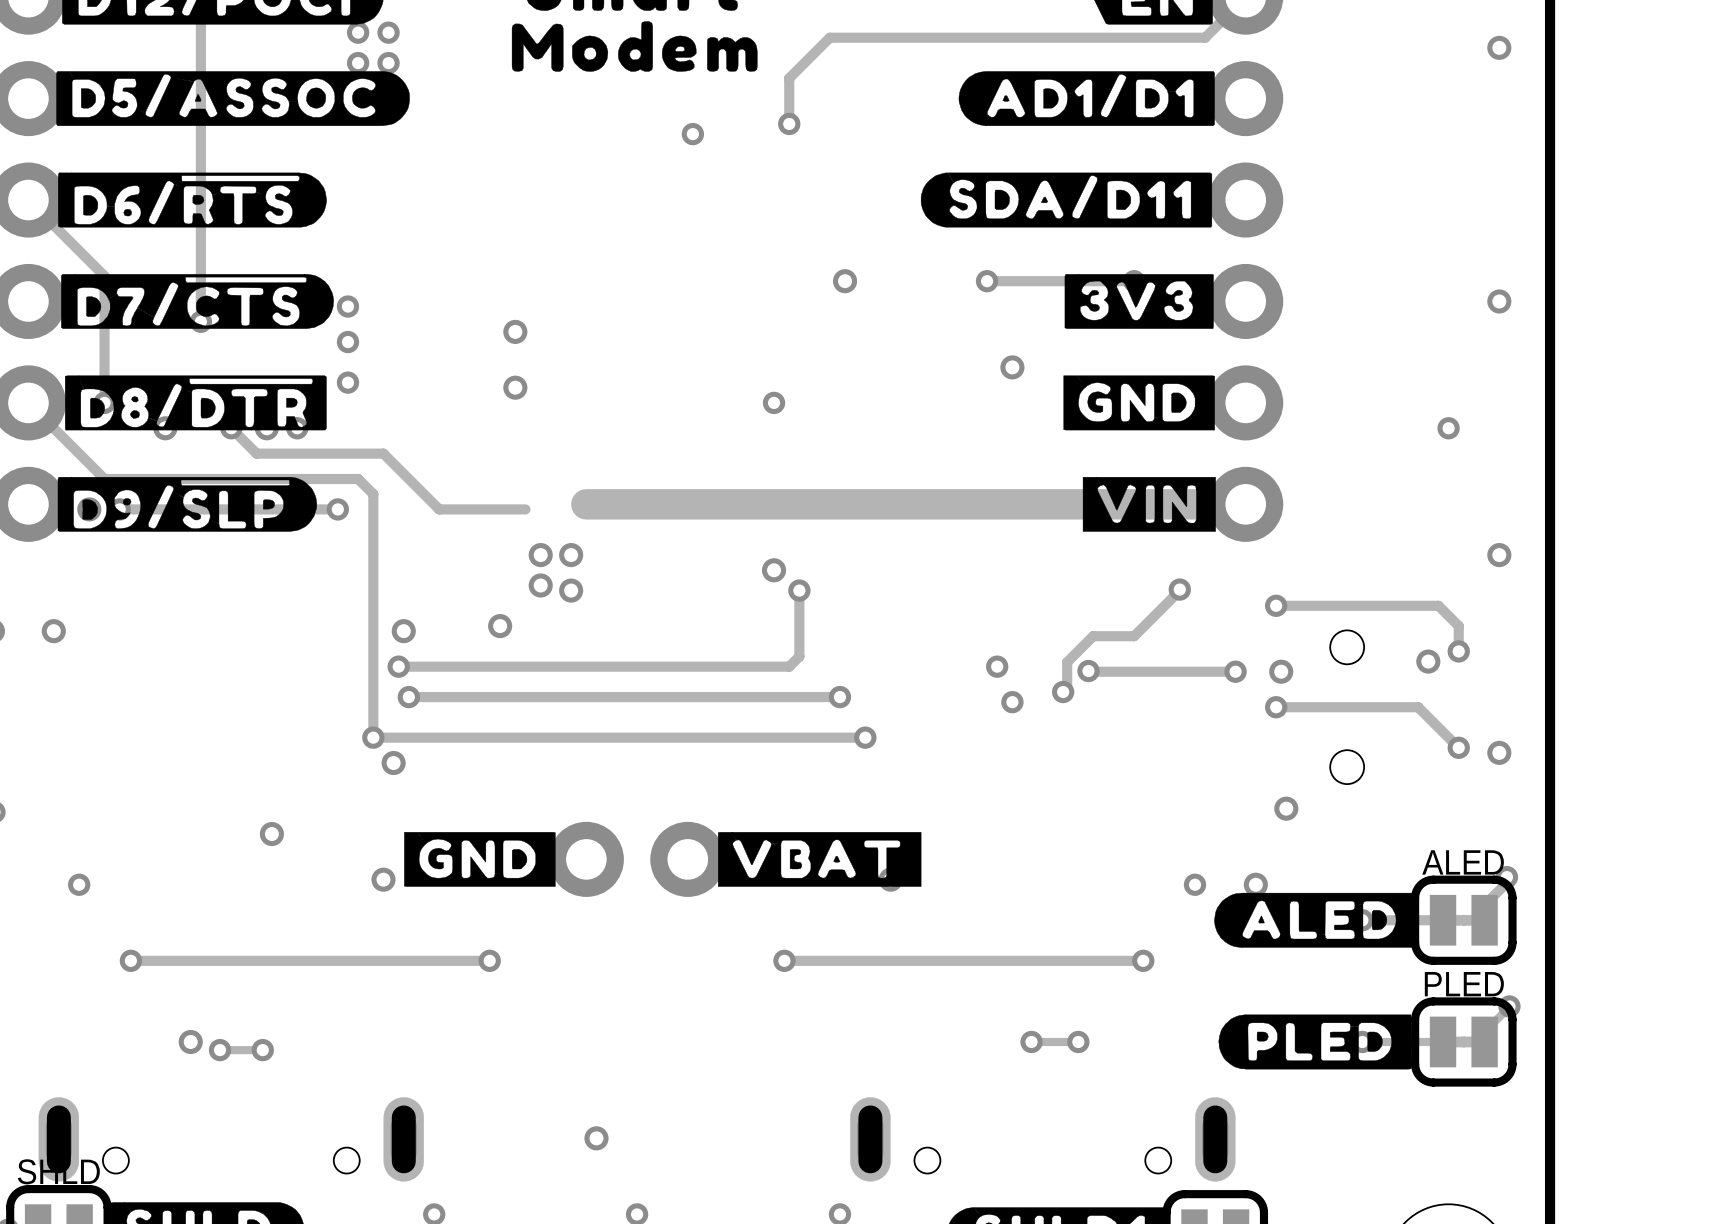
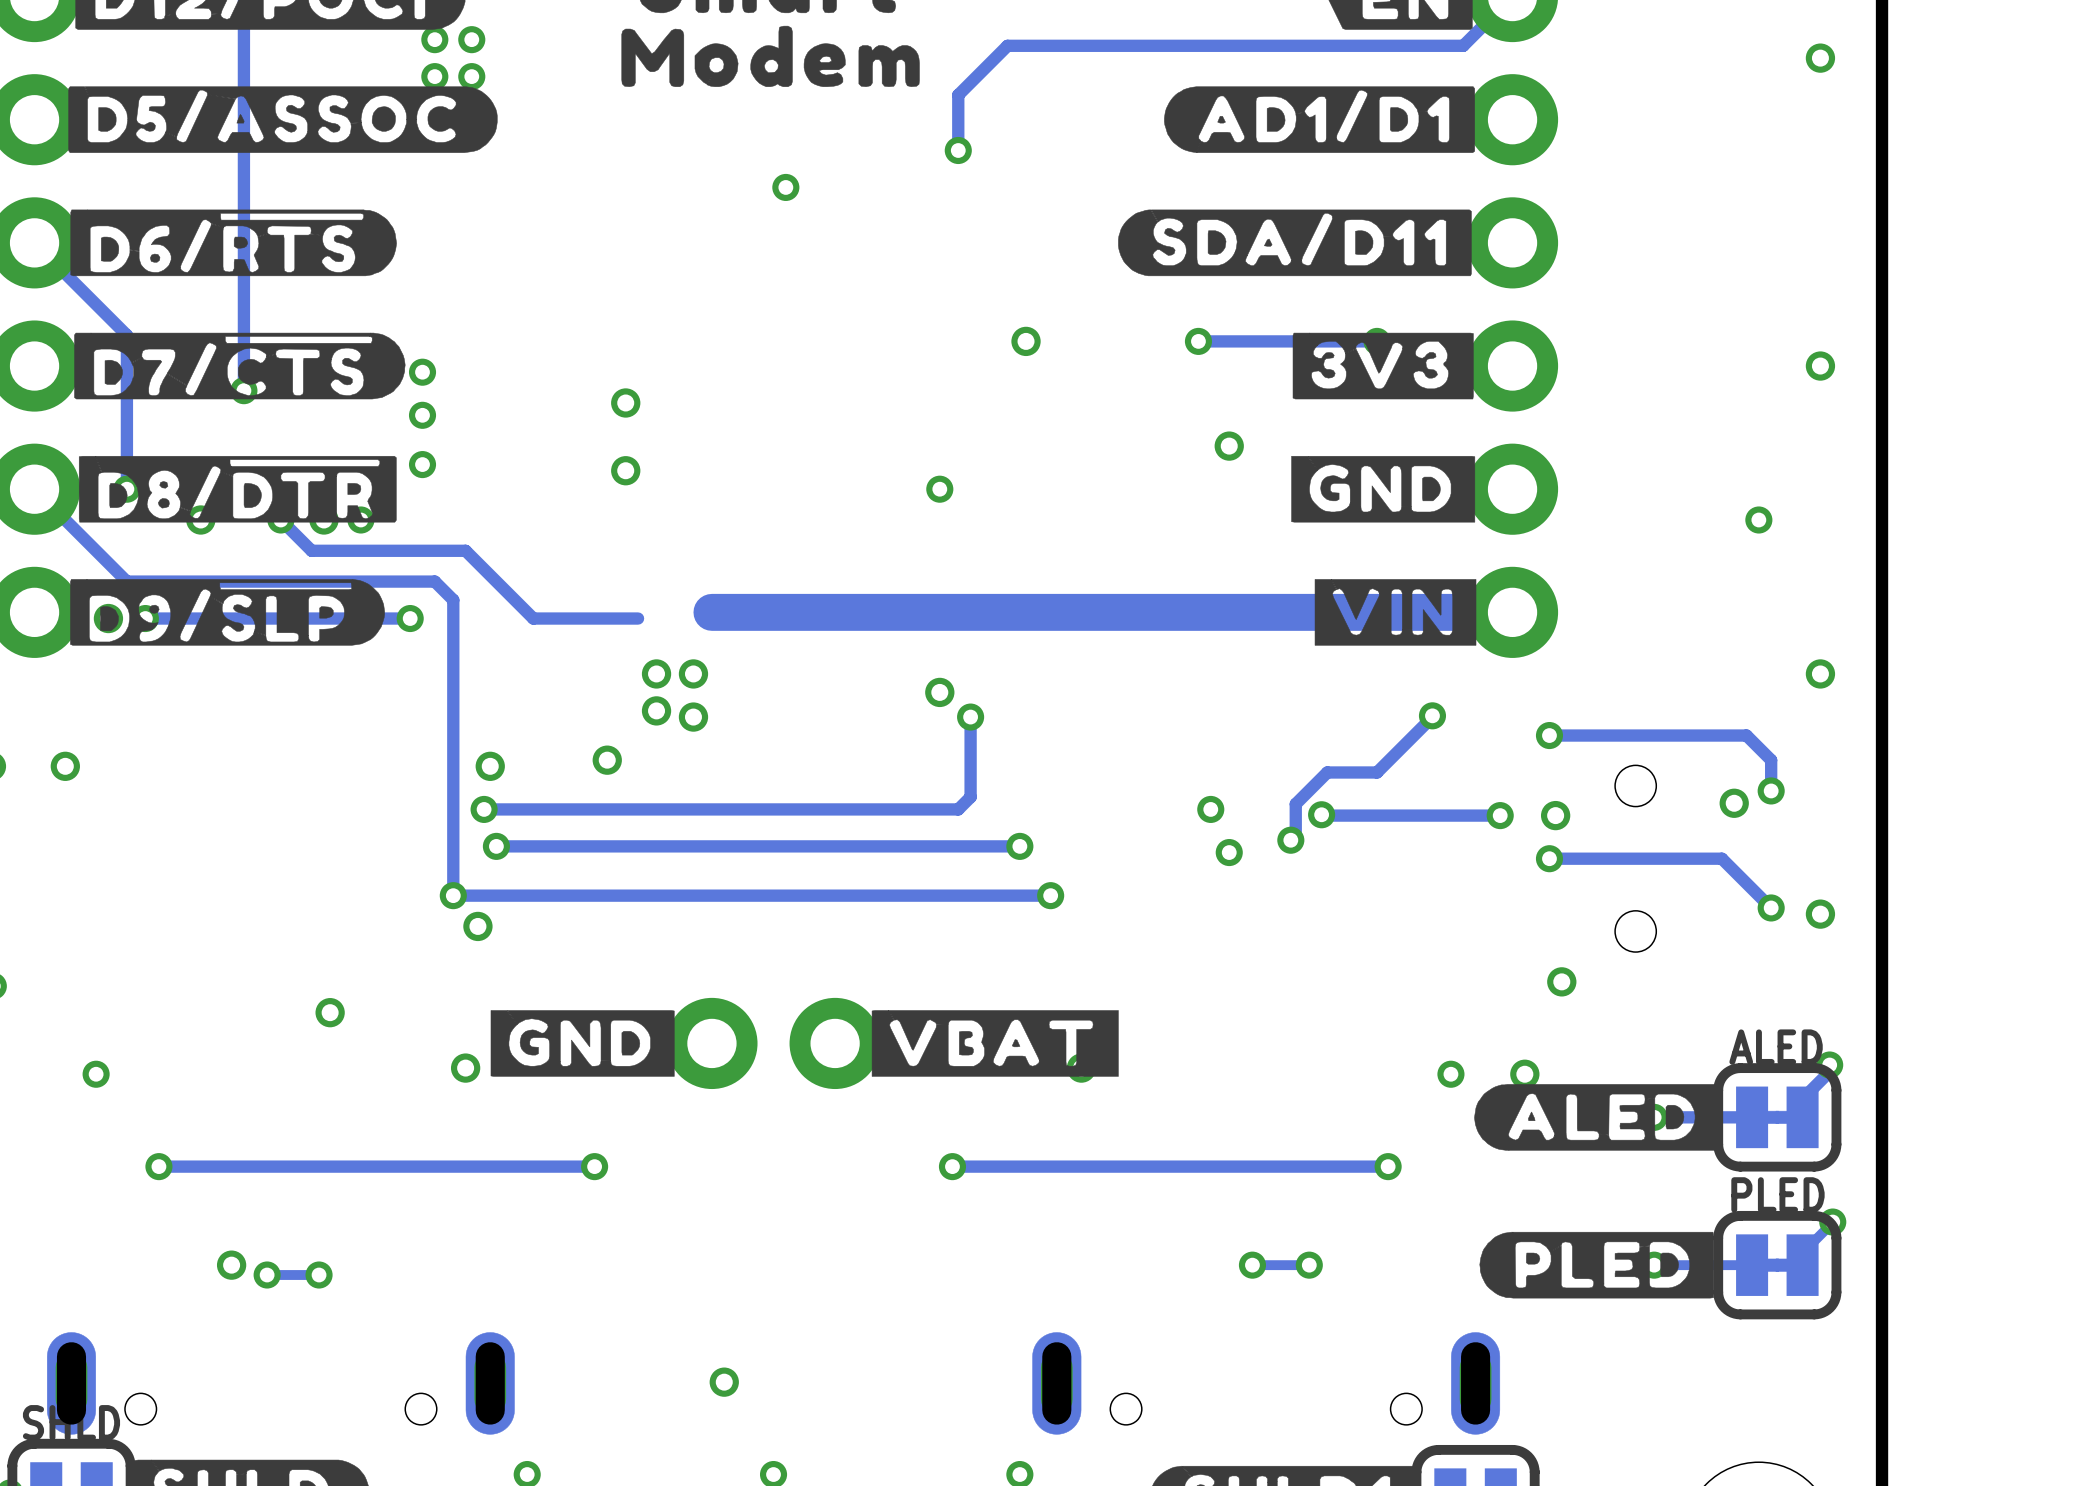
via position: (692, 134) -> (785, 187)

